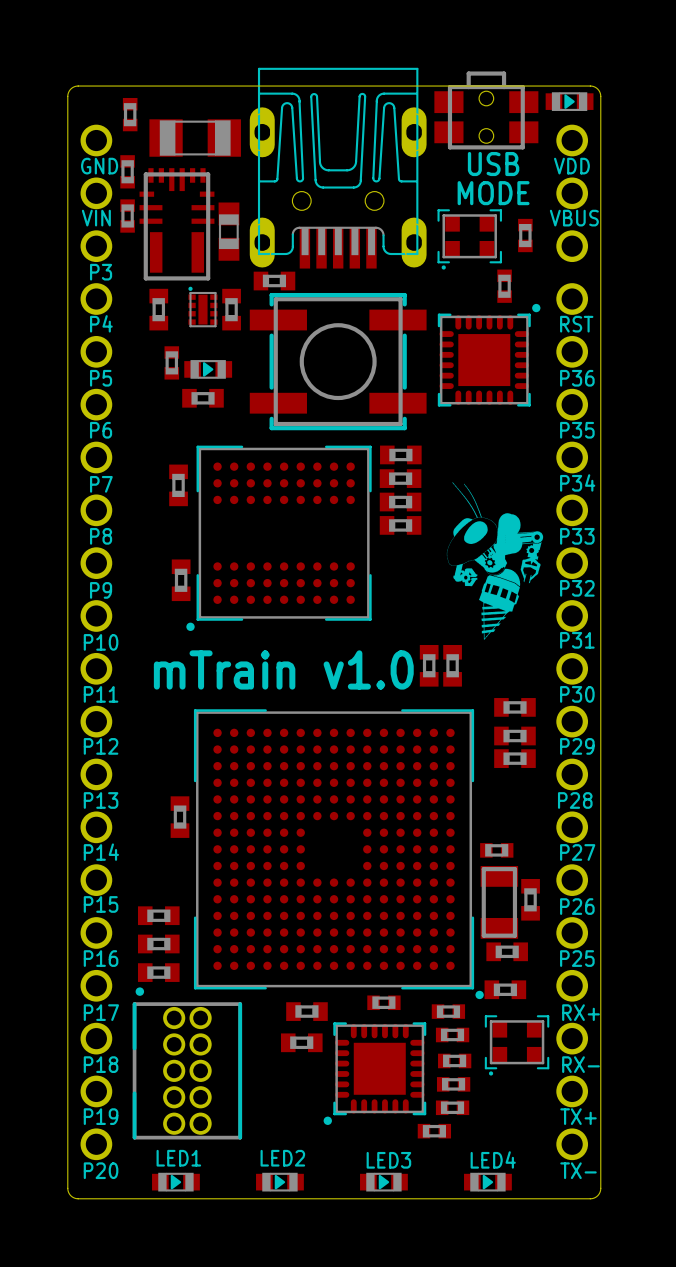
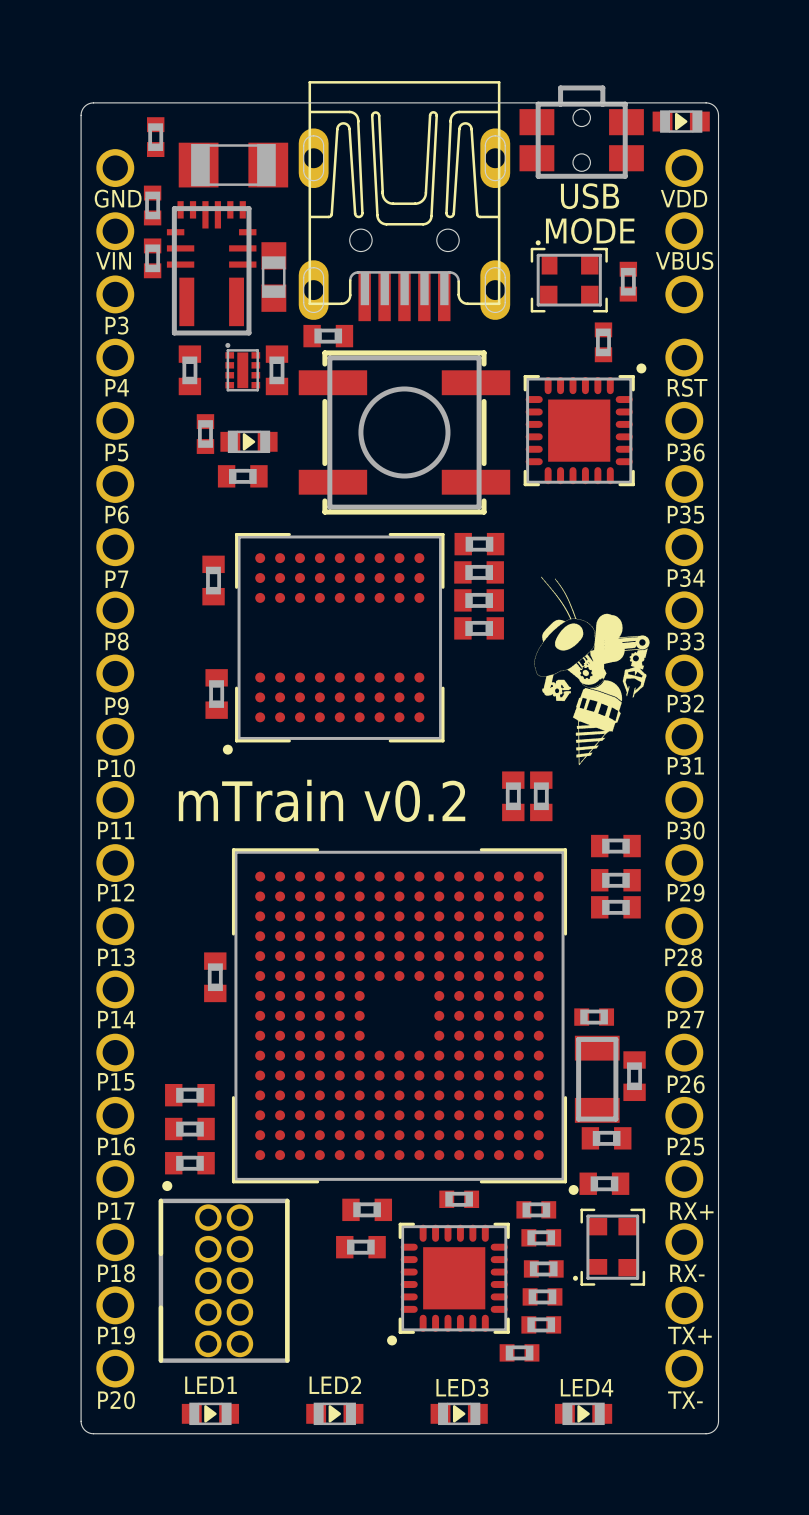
part footprint: [437, 209, 502, 270] -> [530, 240, 608, 313]
part footprint: [188, 286, 218, 328] -> [225, 342, 261, 392]
text: mTrain v1.0 (283, 669) -> mTrain v0.2 (322, 800)
part footprint: [484, 1015, 550, 1076] -> [573, 1208, 646, 1286]

